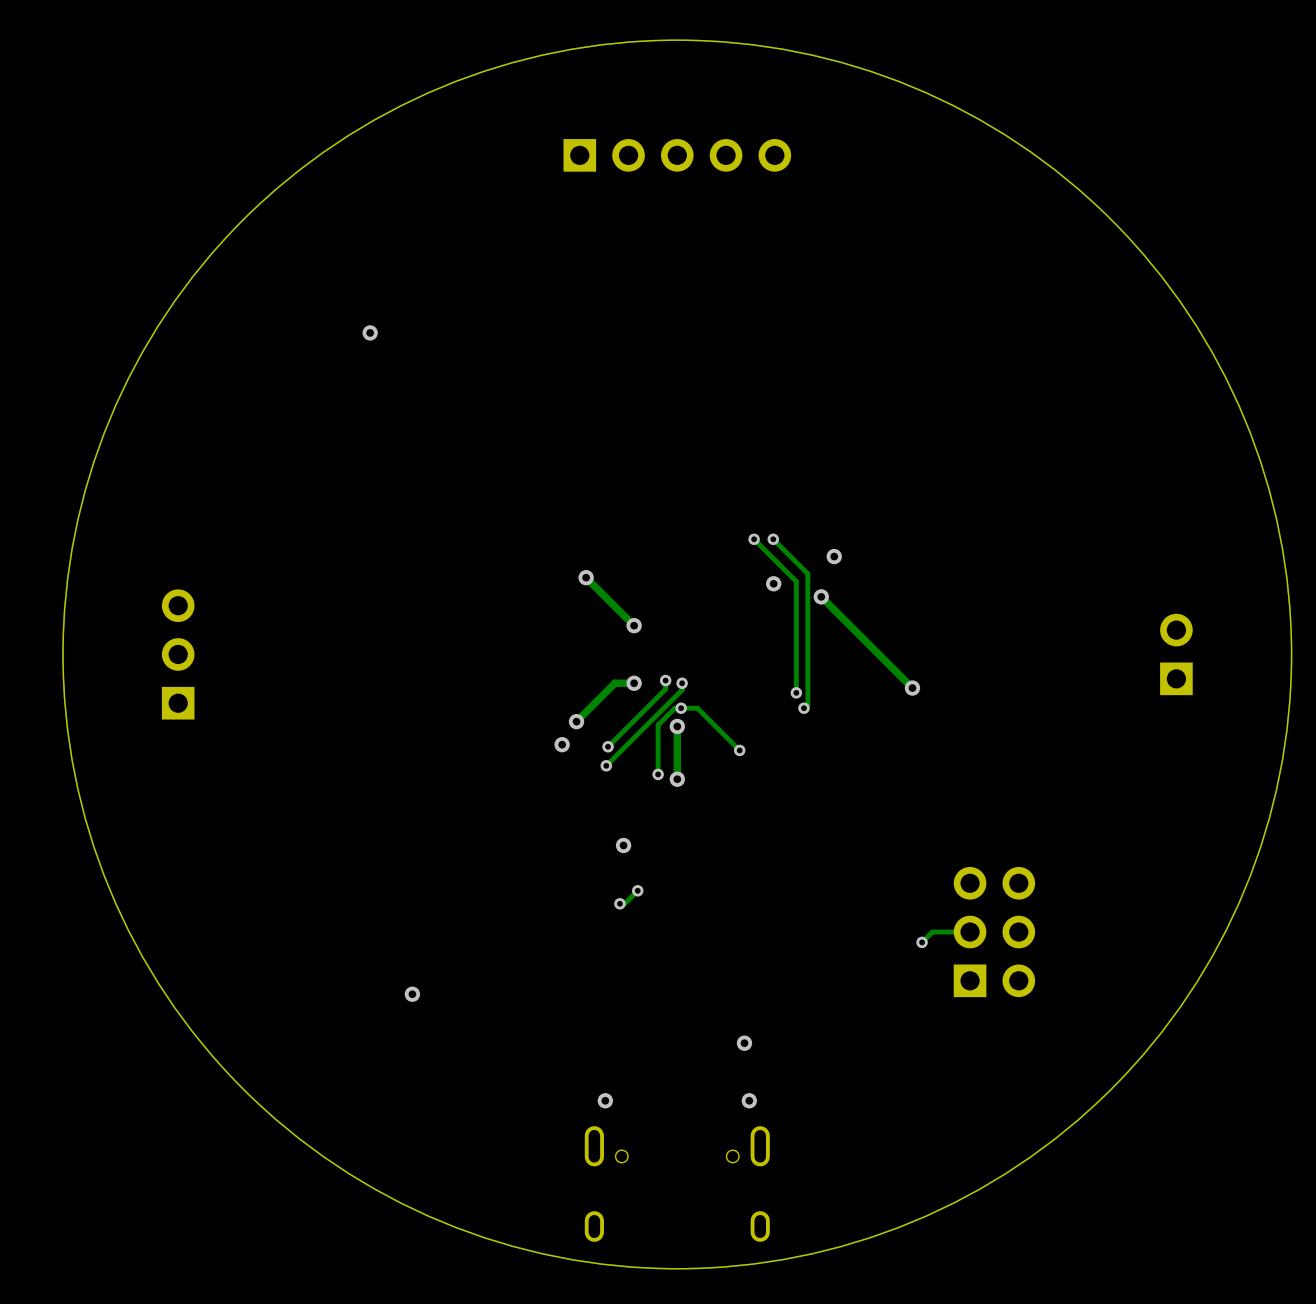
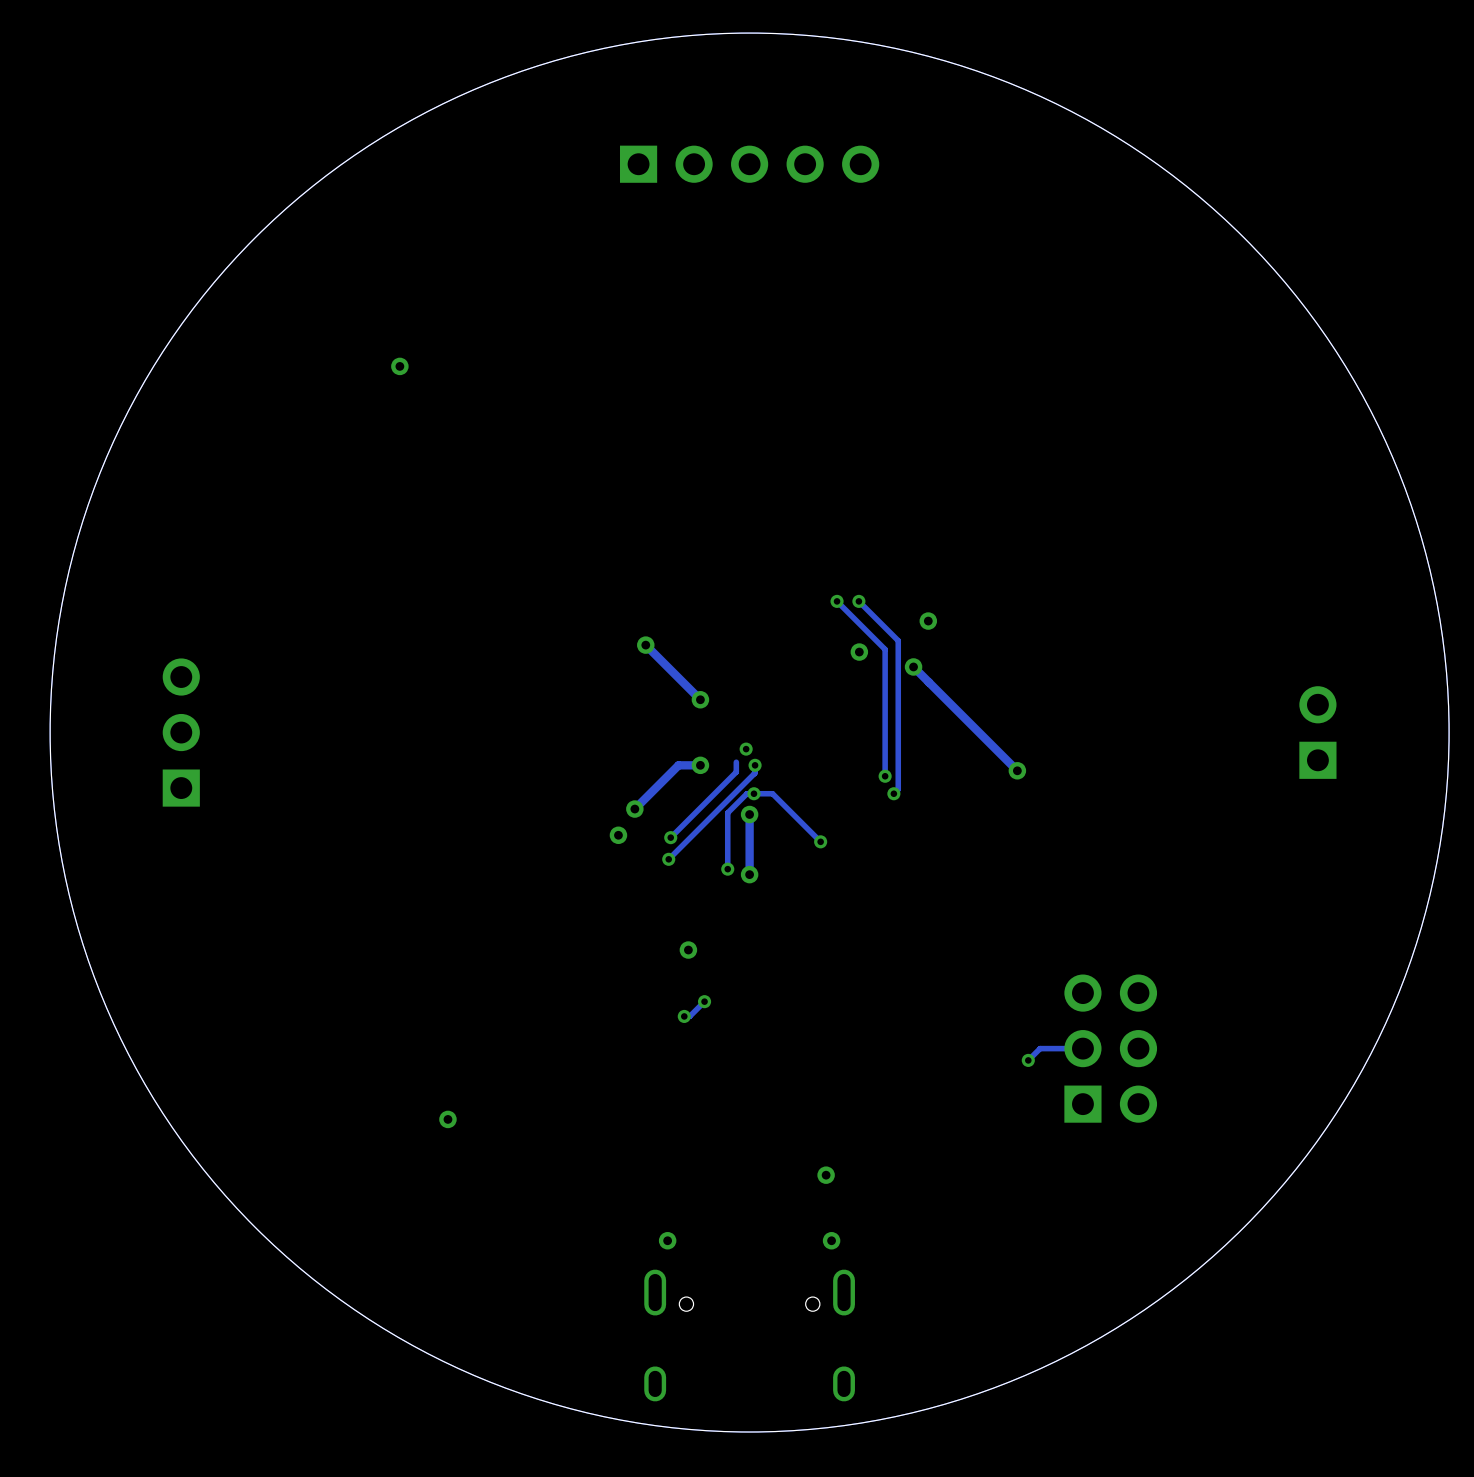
via position: (665, 680) -> (746, 749)

